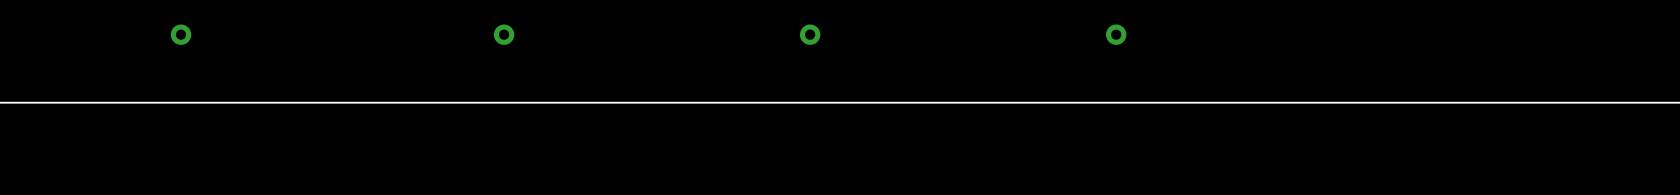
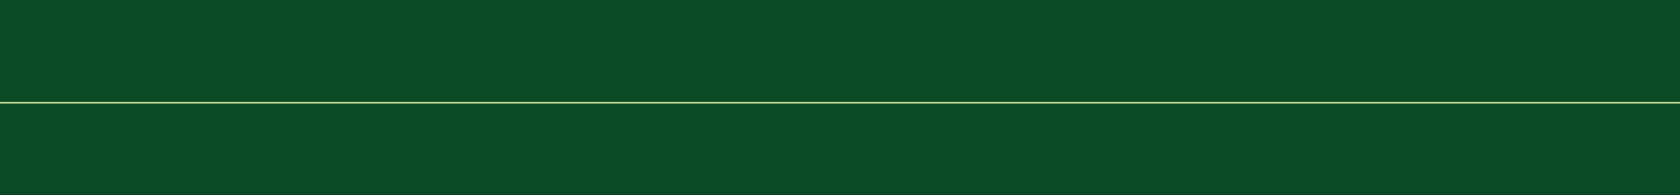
via: (181, 34) -> none
via: (504, 34) -> none
via: (810, 34) -> none
via: (1116, 34) -> none

